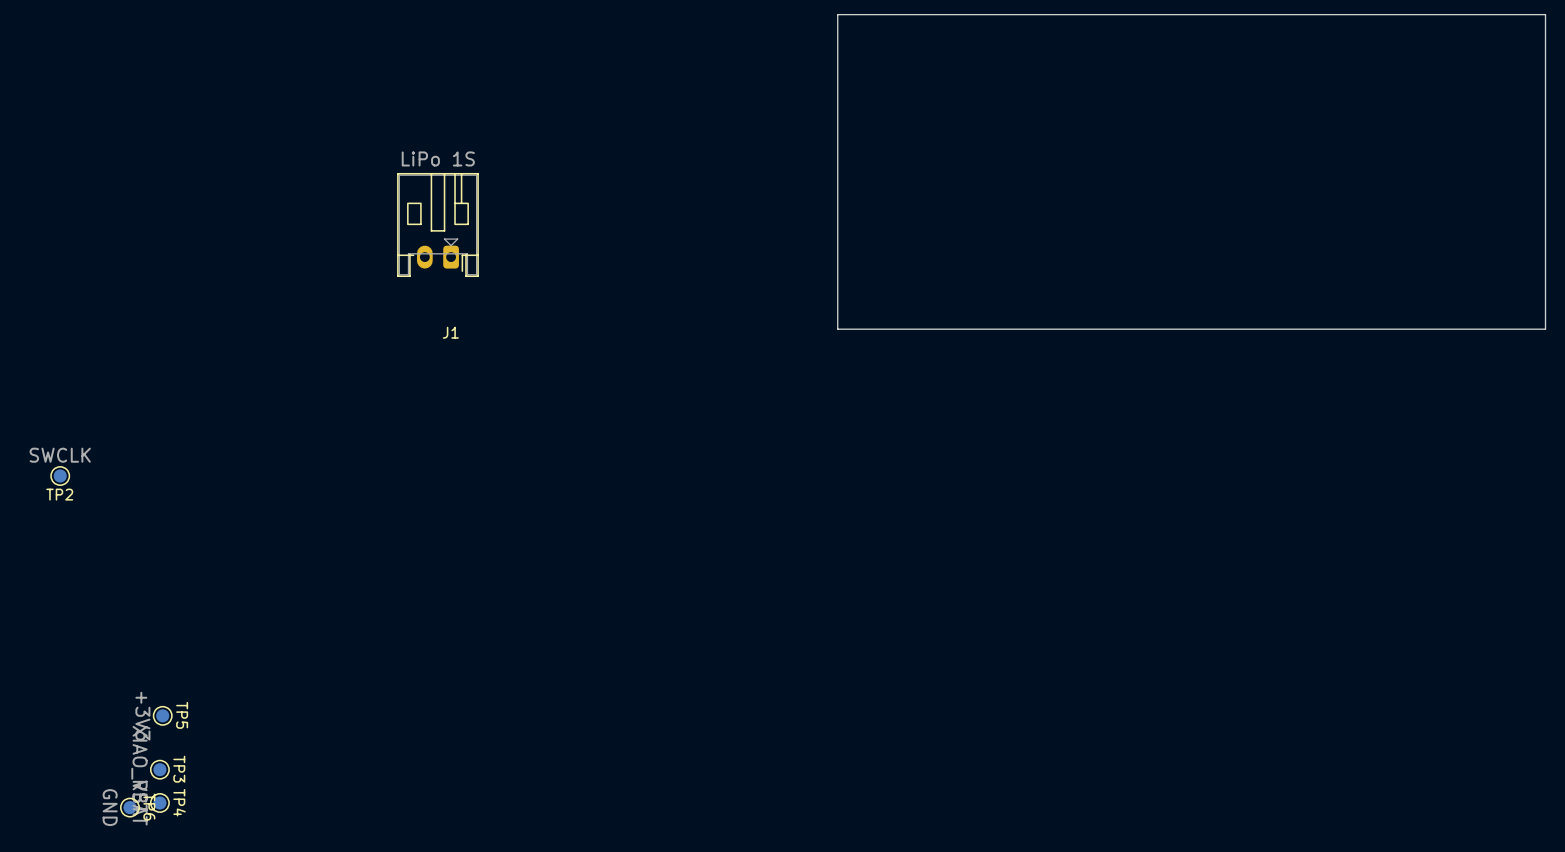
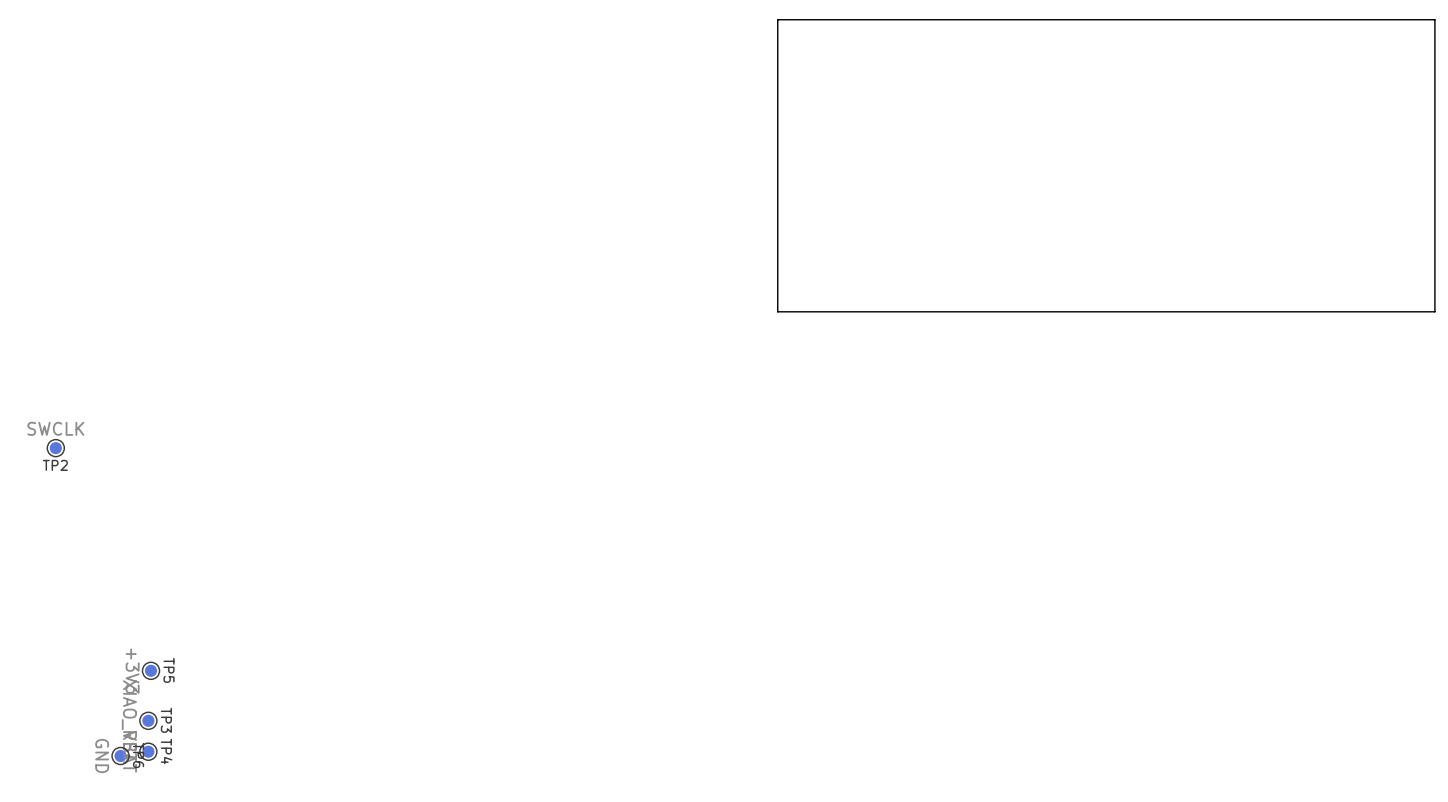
J1: LiPo 1S (437, 224) -> none

